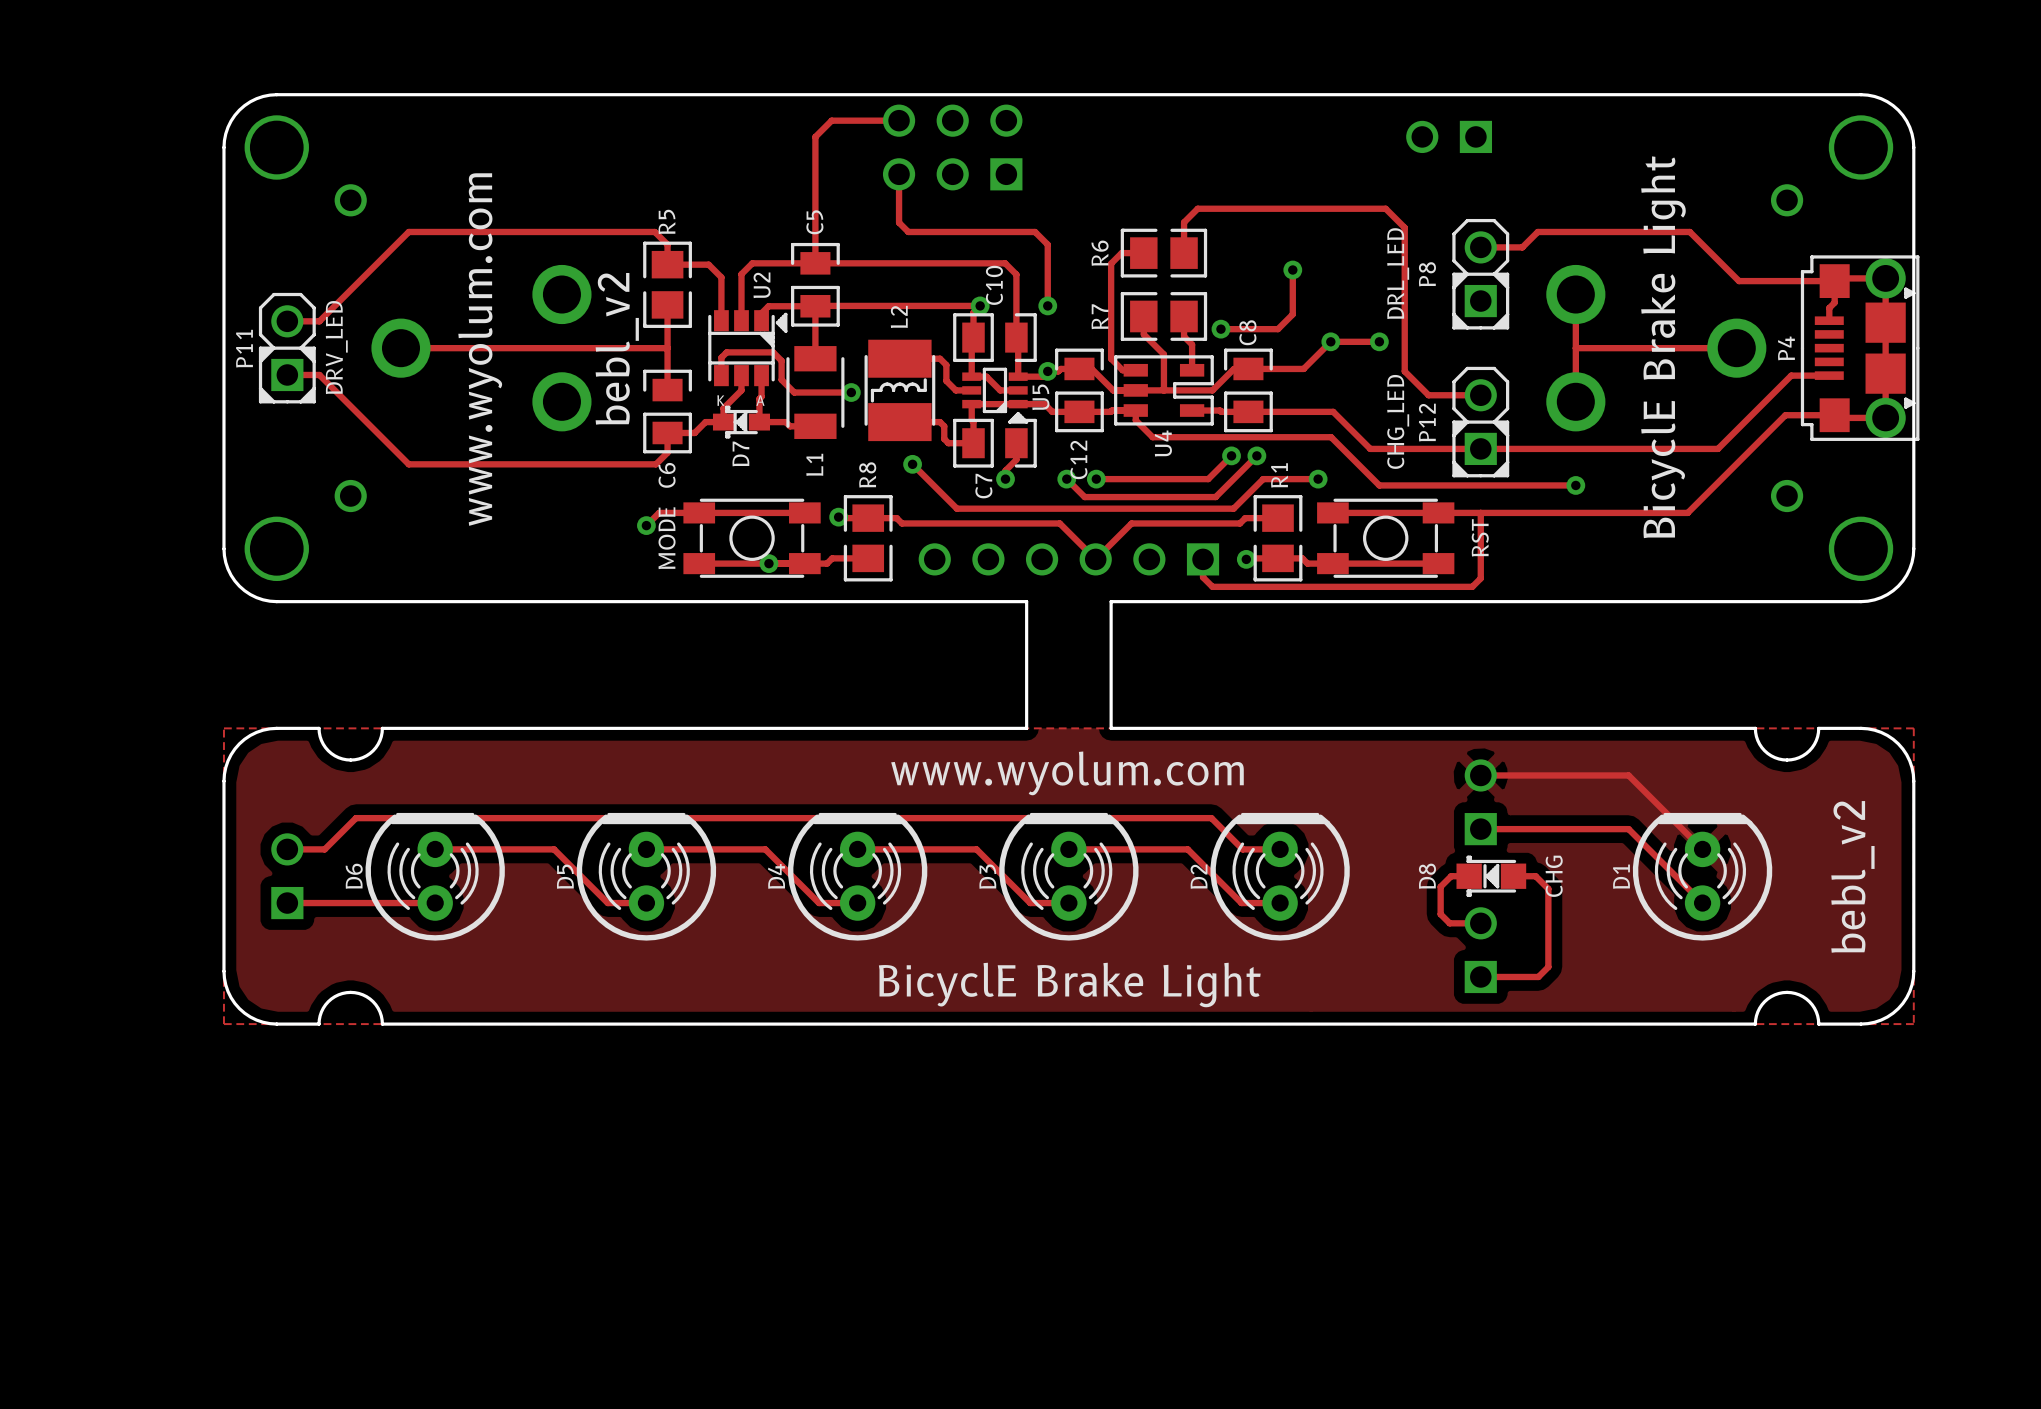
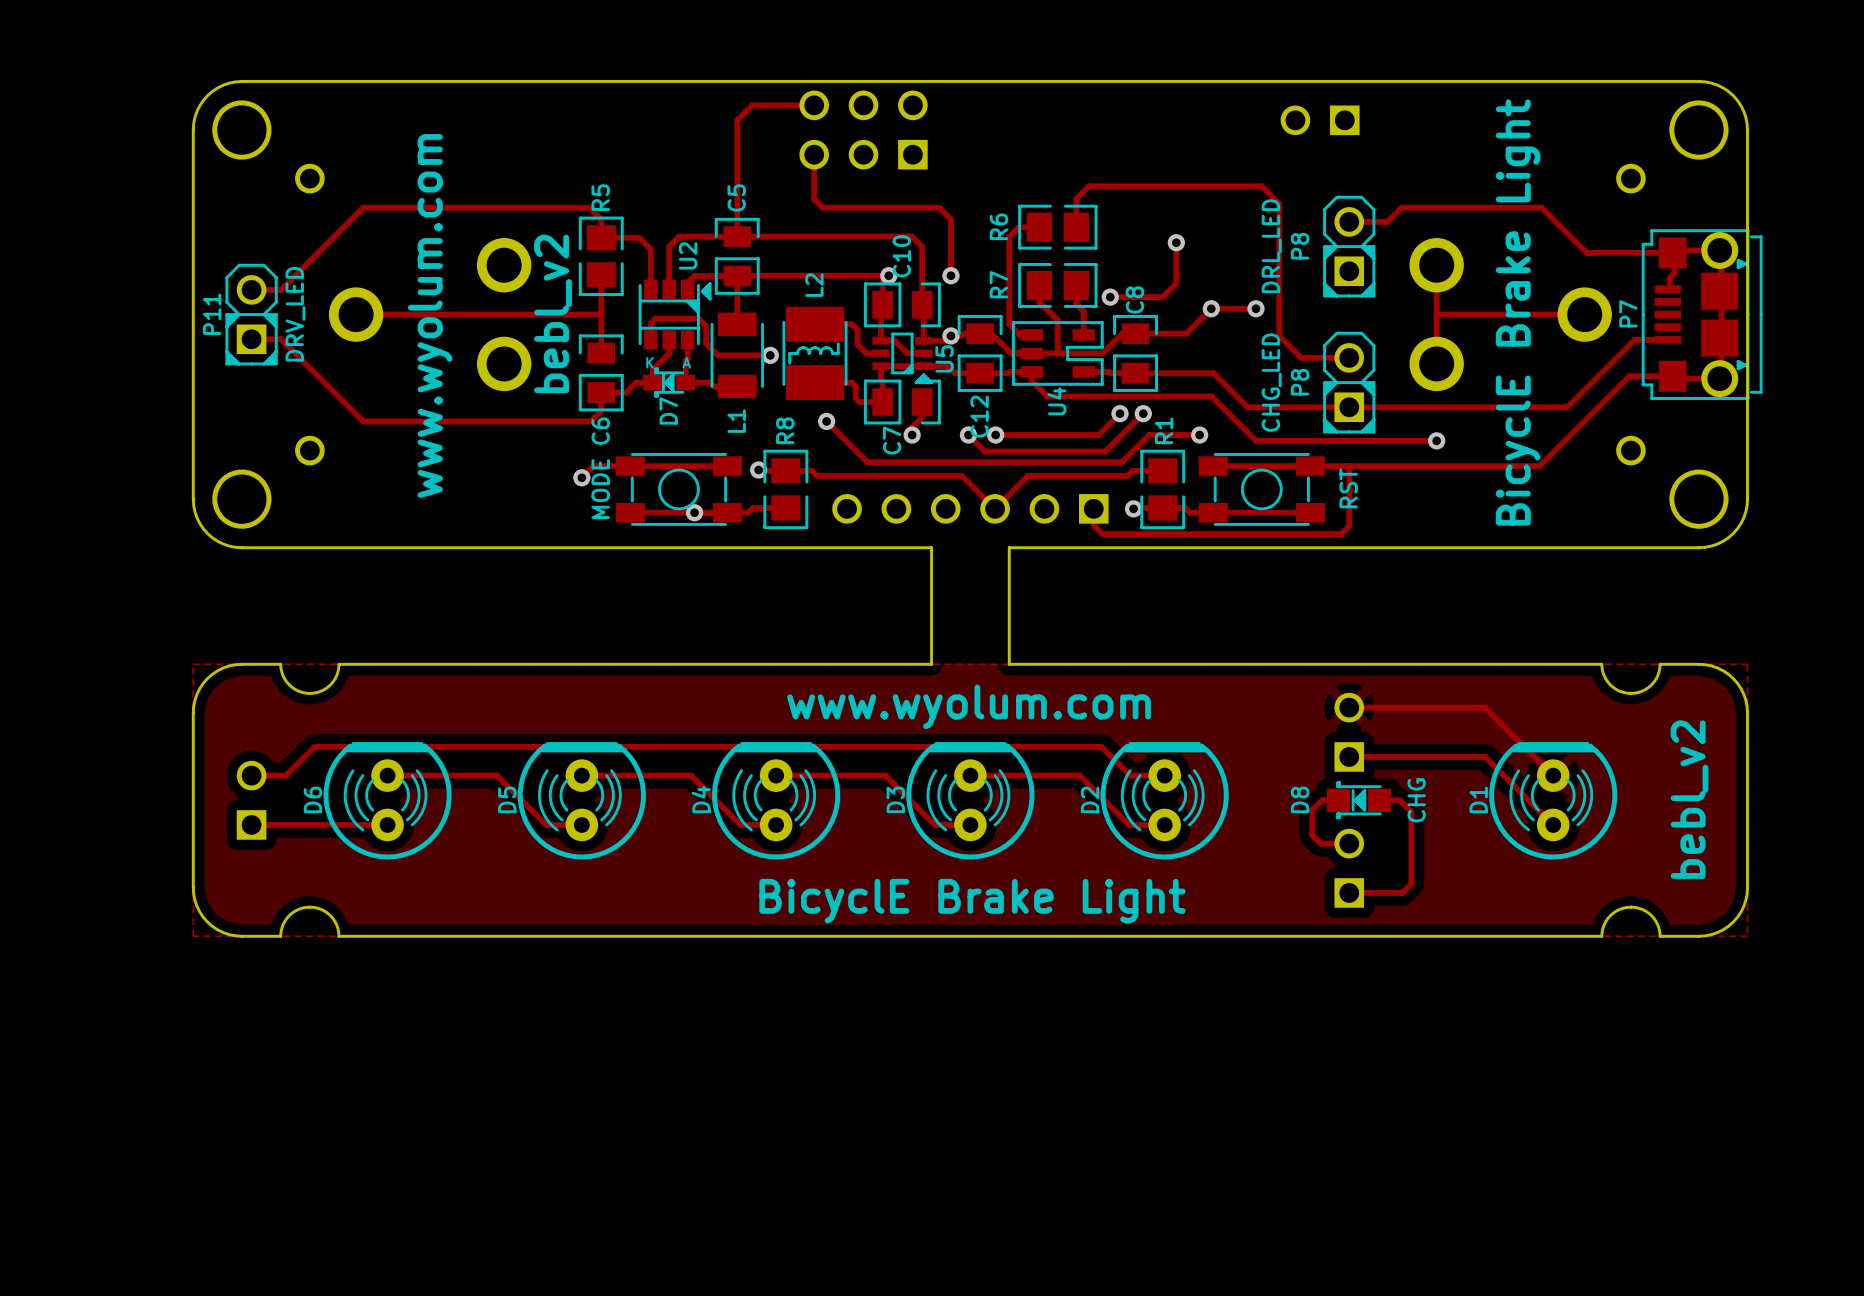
P4: (1860, 348) -> none
P7: none -> (1702, 314)
P12 name: P12 (1427, 422) -> P8 (1300, 382)

